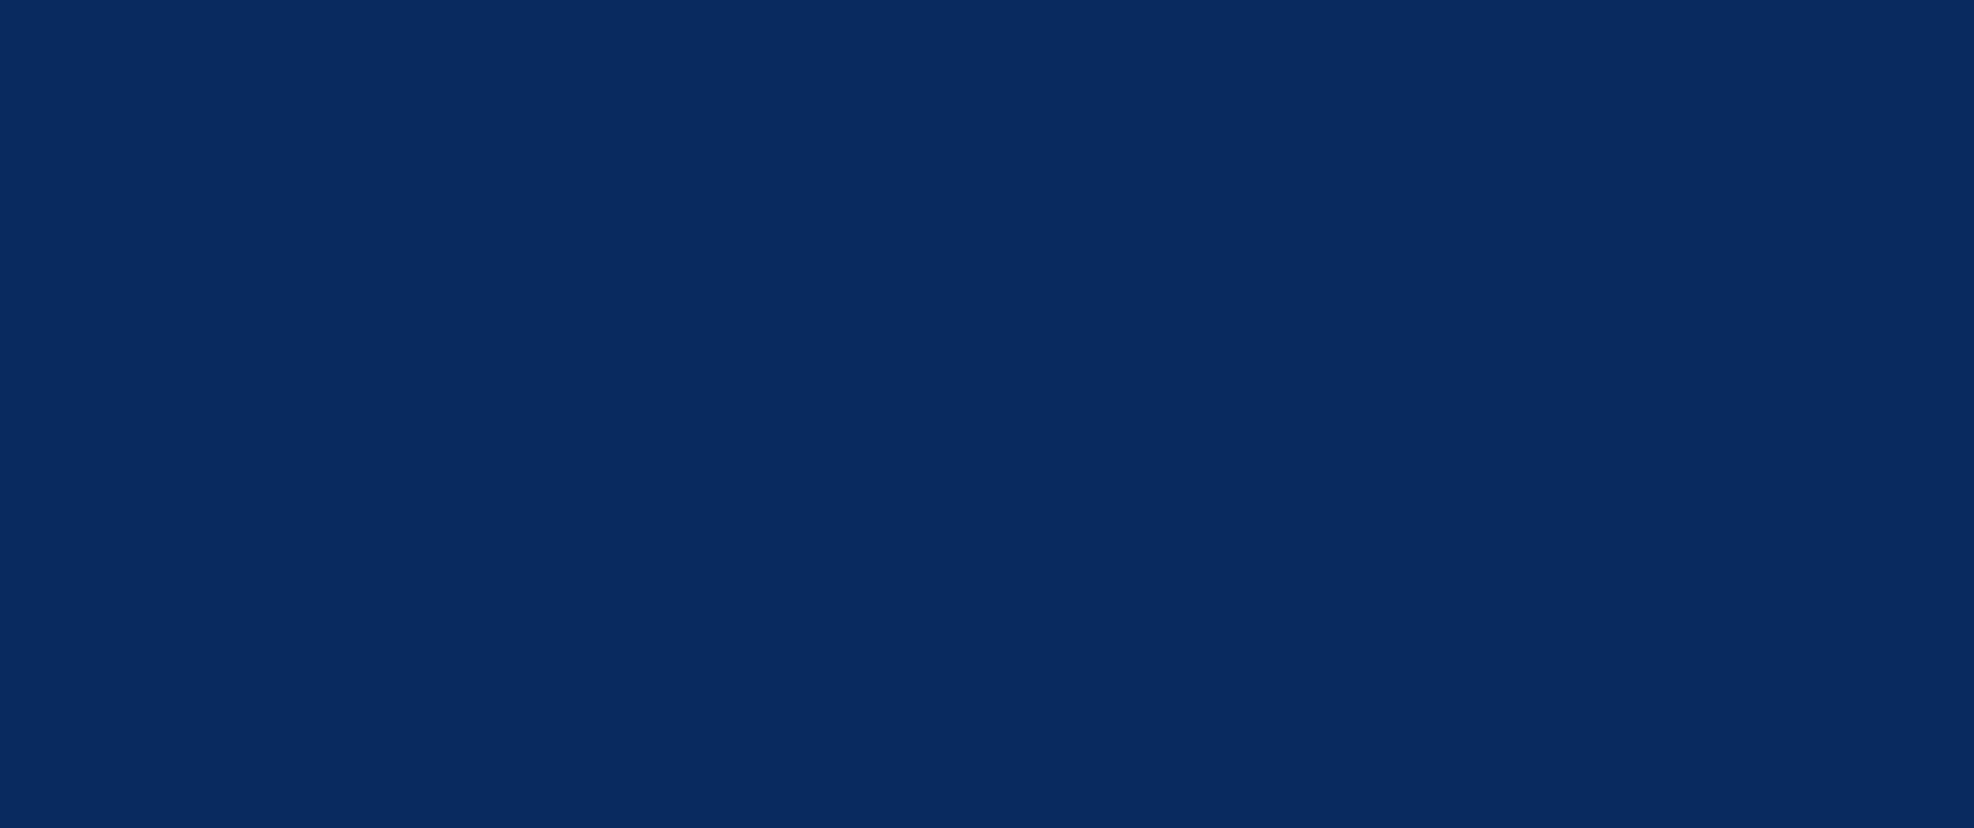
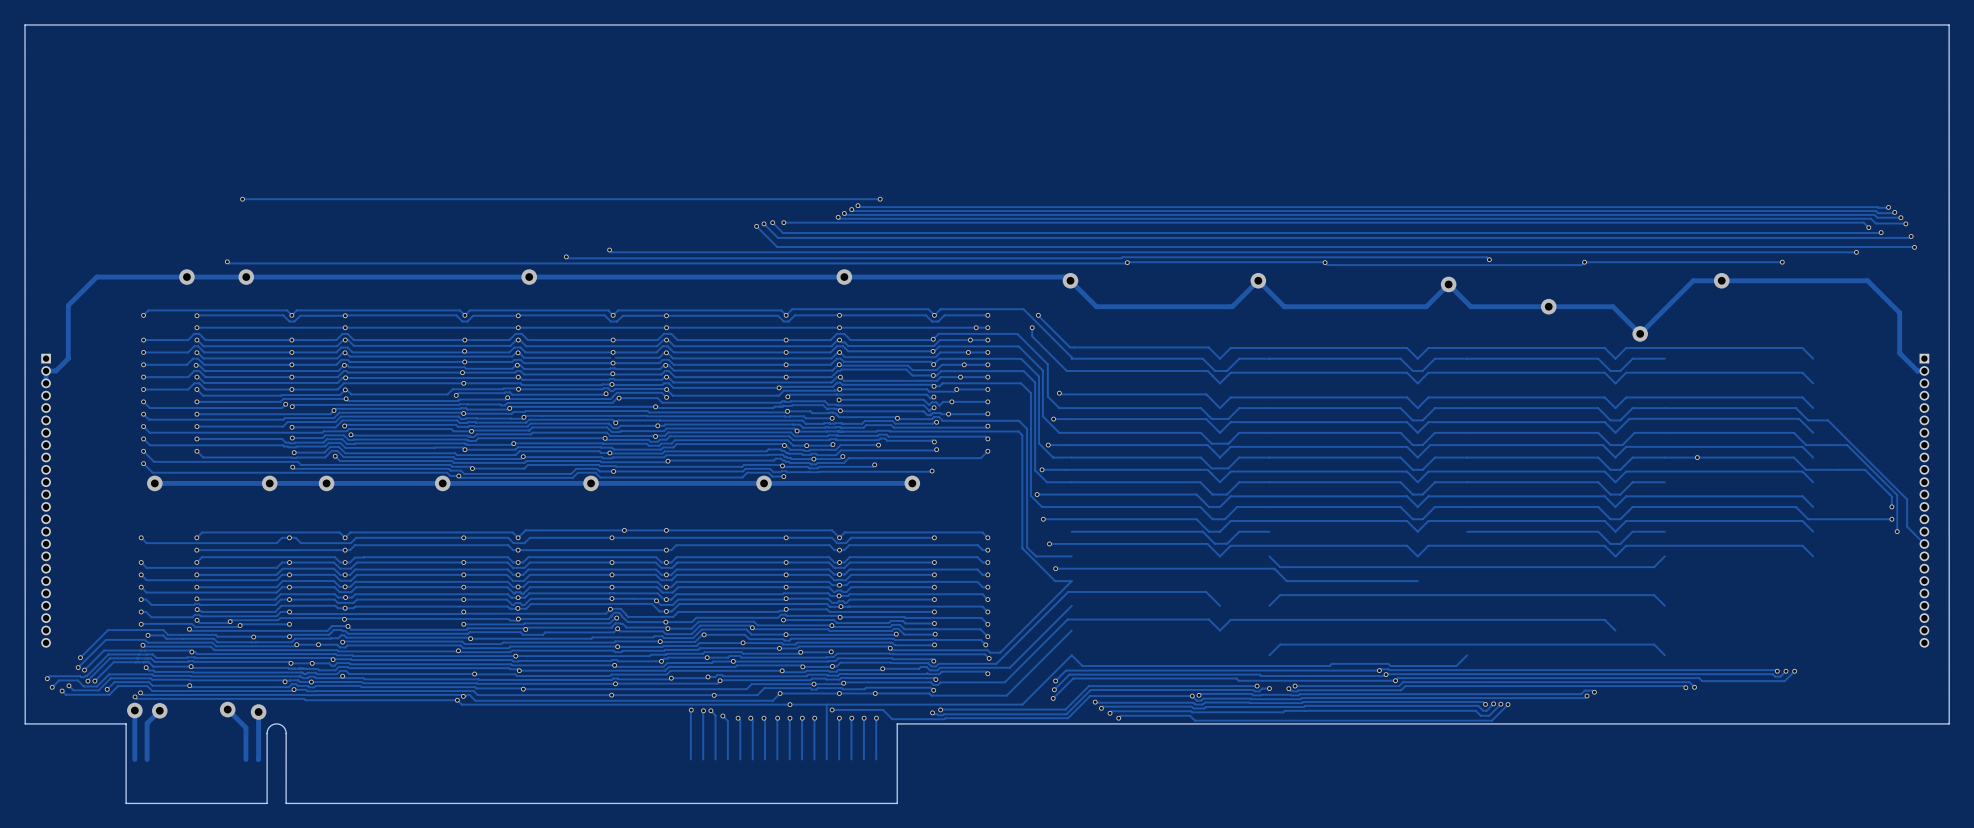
board edge: none -> (1949, 25) (1949, 723) (897, 723) (897, 803) (286, 803) (286, 732) (282, 726) (276, 723) (270, 726) (267, 732) (267, 803) (126, 803) (126, 723) (25, 723) (25, 25) (1949, 25)
via: none -> (242, 199)
track: none -> (880, 199) (242, 199)
via: none -> (880, 199)
track: none -> (857, 205) (1888, 207)
via: none -> (857, 205)
via: none -> (1888, 207)
track: none -> (851, 209) (1894, 212)
via: none -> (851, 209)
via: none -> (1894, 212)
track: none -> (844, 213) (1874, 214) (1877, 217) (1900, 217)
via: none -> (844, 213)
track: none -> (838, 217) (1871, 218) (1875, 223) (1905, 223)
via: none -> (838, 217)
via: none -> (1900, 217)
track: none -> (772, 222) (782, 232) (1881, 232)
via: none -> (772, 222)
track: none -> (783, 222) (1863, 222) (1868, 227)
via: none -> (783, 222)
track: none -> (764, 223) (778, 237) (1911, 236)
via: none -> (764, 223)
via: none -> (1905, 223)
track: none -> (756, 226) (777, 246) (1914, 247)
via: none -> (756, 226)
via: none -> (1868, 227)
via: none -> (1881, 232)
via: none -> (1911, 236)
via: none -> (1914, 247)
track: none -> (609, 250) (611, 252) (1856, 252)
via: none -> (609, 250)
via: none -> (1856, 252)
track: none -> (566, 256) (1486, 257) (1489, 259)
via: none -> (566, 256)
via: none -> (1489, 259)
track: none -> (227, 261) (228, 263) (1324, 262) (1327, 265) (1581, 265) (1584, 262) (1782, 262)
via: none -> (227, 261)
via: none -> (1127, 262)
via: none -> (1325, 262)
via: none -> (1584, 262)
via: none -> (1782, 262)
via: none -> (186, 277)
via: none -> (246, 277)
via: none -> (529, 277)
via: none -> (844, 277)
via: none -> (1070, 280)
via: none -> (1258, 280)
via: none -> (1721, 280)
via: none -> (1448, 284)
via: none -> (1548, 306)
via: none -> (143, 315)
via: none -> (196, 315)
track: none -> (291, 315) (287, 310) (148, 310) (143, 315)
via: none -> (291, 315)
via: none -> (345, 315)
track: none -> (464, 315) (460, 310) (296, 310) (291, 315)
via: none -> (464, 315)
via: none -> (518, 315)
track: none -> (613, 315) (608, 310) (469, 310) (464, 315)
via: none -> (613, 315)
via: none -> (666, 315)
track: none -> (786, 315) (781, 310) (618, 310) (613, 315)
via: none -> (786, 315)
via: none -> (839, 315)
track: none -> (934, 315) (928, 309) (792, 309) (786, 315)
track: none -> (934, 315) (940, 309) (1023, 309) (1071, 358) (1202, 358) (1215, 370) (1226, 370) (1239, 358) (1400, 358) (1412, 370) (1422, 370) (1434, 358) (1598, 358) (1610, 370) (1620, 370) (1632, 358) (1664, 358)
via: none -> (934, 315)
track: none -> (987, 315) (944, 315) (938, 321) (932, 321) (925, 315) (794, 315) (788, 321) (783, 321) (778, 315) (622, 315) (616, 321) (610, 321) (604, 315) (473, 315) (467, 321) (462, 321) (456, 315) (300, 315) (294, 321) (289, 321) (283, 315) (196, 315)
via: none -> (987, 315)
track: none -> (1038, 315) (1070, 347) (1208, 347) (1220, 358) (1230, 348) (1407, 348) (1417, 358) (1428, 348) (1604, 348) (1615, 358) (1626, 348) (1802, 348) (1813, 358)
via: none -> (1038, 315)
via: none -> (196, 327)
via: none -> (345, 327)
via: none -> (518, 327)
via: none -> (666, 327)
via: none -> (839, 327)
via: none -> (976, 327)
track: none -> (987, 327) (196, 327)
via: none -> (987, 327)
track: none -> (1032, 327) (1032, 336) (1066, 370) (1207, 370) (1212, 375)
via: none -> (1032, 327)
via: none -> (1640, 333)
via: none -> (933, 339)
track: none -> (143, 340) (188, 340) (194, 333) (199, 333) (205, 340) (336, 340) (342, 333) (347, 333) (353, 340) (509, 340) (515, 333) (521, 333) (528, 340) (657, 340) (663, 333) (671, 333) (677, 340) (830, 340) (836, 333) (844, 333) (850, 340) (932, 340) (938, 333) (1017, 333) (1047, 364) (1047, 396) (1059, 408) (1200, 408) (1211, 418) (1228, 418) (1239, 408) (1400, 408) (1412, 420) (1422, 420) (1434, 408) (1598, 408) (1610, 420) (1620, 420) (1632, 408) (1795, 408) (1808, 420) (1828, 420) (1907, 499) (1907, 526) (1924, 543)
via: none -> (143, 340)
via: none -> (196, 340)
via: none -> (291, 340)
via: none -> (345, 340)
via: none -> (464, 340)
via: none -> (518, 340)
via: none -> (613, 340)
via: none -> (666, 340)
via: none -> (786, 340)
via: none -> (839, 340)
via: none -> (970, 340)
track: none -> (987, 340) (940, 340) (934, 345) (848, 345) (837, 340) (831, 346) (674, 346) (668, 340) (663, 340) (657, 346) (526, 346) (519, 340) (516, 340) (510, 345) (353, 345) (348, 340) (343, 340) (337, 346) (203, 346) (196, 340)
via: none -> (987, 340)
via: none -> (464, 351)
track: none -> (848, 351) (843, 346) (836, 346) (830, 352) (673, 352) (667, 346) (662, 346) (656, 352) (613, 352)
track: none -> (848, 351) (934, 351) (939, 346) (1018, 346) (1042, 370) (1042, 416) (1059, 432) (1200, 432) (1211, 443) (1228, 443) (1239, 432) (1400, 432) (1412, 445) (1422, 445) (1434, 432) (1598, 432) (1610, 445) (1622, 445) (1634, 432) (1793, 432) (1806, 445) (1847, 445) (1897, 495) (1897, 531)
via: none -> (933, 351)
via: none -> (143, 352)
track: none -> (196, 352) (203, 358) (337, 358) (342, 352) (346, 352) (349, 356) (512, 356) (515, 352) (519, 352) (524, 357) (610, 357)
via: none -> (196, 352)
via: none -> (291, 352)
via: none -> (345, 352)
via: none -> (518, 352)
track: none -> (613, 352) (525, 352) (520, 347) (514, 347) (509, 352) (352, 352) (347, 347) (341, 347) (336, 352) (204, 352) (198, 346) (194, 346) (188, 352) (143, 352)
via: none -> (613, 352)
via: none -> (666, 352)
via: none -> (786, 352)
via: none -> (839, 352)
via: none -> (968, 352)
track: none -> (987, 352) (940, 352) (935, 357) (844, 357) (837, 352) (831, 358) (672, 358) (667, 352) (664, 352) (659, 357) (615, 357)
via: none -> (987, 352)
via: none -> (464, 361)
track: none -> (612, 363) (523, 363) (520, 359) (514, 359) (512, 361) (349, 361) (347, 359) (341, 359) (336, 364) (204, 364) (198, 358) (193, 358) (186, 364) (143, 364)
track: none -> (613, 363) (659, 363) (662, 359) (668, 359) (673, 364) (830, 364) (836, 358) (840, 358) (843, 361) (930, 361) (933, 364) (939, 358) (1021, 358) (1039, 376) (1039, 443) (1053, 457) (1200, 457) (1211, 468) (1228, 468) (1239, 457) (1400, 457) (1412, 469) (1422, 469) (1434, 457) (1598, 457) (1610, 469) (1620, 469) (1632, 457) (1793, 457) (1806, 469) (1865, 469) (1891, 496) (1891, 506)
via: none -> (613, 363)
via: none -> (143, 364)
via: none -> (291, 364)
via: none -> (786, 364)
via: none -> (839, 364)
via: none -> (933, 364)
via: none -> (964, 364)
track: none -> (987, 364) (941, 364) (936, 370) (912, 370) (908, 365) (838, 364) (832, 370) (674, 370) (668, 365) (664, 365) (660, 369) (524, 369) (520, 365) (515, 365) (512, 368) (349, 367) (344, 365) (338, 370) (204, 370) (199, 365) (196, 365)
via: none -> (987, 364)
via: none -> (196, 365)
via: none -> (344, 365)
via: none -> (517, 365)
via: none -> (665, 365)
track: none -> (1924, 370) (1917, 370) (1899, 353) (1899, 312) (1867, 280) (1693, 280) (1640, 333) (1613, 306) (1470, 306) (1448, 284) (1426, 306) (1284, 306) (1258, 280) (1232, 306) (1096, 306) (1066, 277) (96, 277) (68, 305) (68, 358) (55, 370) (46, 370) (46, 383)
via: none -> (462, 372)
via: none -> (612, 373)
via: none -> (933, 375)
track: none -> (1212, 376) (1220, 383) (1230, 372) (1407, 372) (1417, 383) (1428, 372) (1604, 372) (1615, 383) (1626, 372) (1802, 372) (1813, 383)
track: none -> (143, 377) (188, 377) (194, 370) (199, 370) (205, 377) (337, 377) (343, 370) (348, 372) (515, 372) (520, 370) (524, 374) (661, 374) (665, 370) (668, 370) (675, 377) (831, 377) (841, 369) (906, 369) (912, 375) (936, 375) (941, 371) (1023, 371) (1035, 382) (1035, 470) (1046, 482) (1200, 482) (1212, 494) (1226, 494) (1239, 482) (1400, 482) (1412, 494) (1422, 494) (1434, 482) (1598, 482)
via: none -> (143, 377)
via: none -> (196, 377)
via: none -> (291, 377)
via: none -> (345, 377)
via: none -> (518, 377)
via: none -> (666, 377)
via: none -> (786, 377)
via: none -> (840, 377)
via: none -> (960, 377)
track: none -> (987, 377) (940, 377) (937, 380) (844, 380) (840, 377) (836, 377) (831, 382) (673, 382) (668, 377) (661, 379) (522, 379) (519, 377) (342, 377) (337, 382) (204, 382) (196, 377)
via: none -> (987, 377)
via: none -> (463, 383)
via: none -> (611, 384)
via: none -> (934, 386)
via: none -> (779, 387)
track: none -> (143, 389) (188, 389) (194, 383) (199, 383) (205, 389) (337, 389) (343, 383) (520, 383) (522, 385) (662, 385) (668, 383) (673, 387) (832, 386) (837, 382) (842, 384) (932, 384) (934, 386) (939, 386) (942, 383) (1021, 383) (1030, 393) (1030, 495) (1042, 506) (1200, 506)
via: none -> (143, 389)
via: none -> (196, 389)
via: none -> (291, 389)
via: none -> (345, 389)
via: none -> (518, 389)
via: none -> (666, 389)
via: none -> (839, 389)
via: none -> (956, 389)
track: none -> (987, 389) (956, 389) (954, 391) (929, 391) (926, 389) (783, 390) (778, 395) (672, 395) (666, 388) (615, 388) (611, 391) (608, 388) (452, 389) (447, 394) (351, 394) (345, 389) (340, 395) (203, 395) (196, 389)
via: none -> (987, 389)
track: none -> (606, 393) (512, 394) (505, 392) (458, 393) (456, 395)
via: none -> (606, 393)
track: none -> (1059, 393) (1206, 394) (1220, 408) (1230, 397) (1407, 397) (1417, 408) (1428, 397) (1604, 397) (1615, 408) (1626, 397) (1802, 397) (1813, 408)
via: none -> (1059, 393)
track: none -> (836, 394) (841, 394)
track: none -> (836, 394) (789, 394) (787, 396)
track: none -> (841, 394) (926, 394) (930, 398) (933, 397)
via: none -> (456, 395)
via: none -> (787, 396)
via: none -> (507, 397)
track: none -> (666, 397) (662, 392) (616, 392) (610, 399) (507, 397) (505, 399) (457, 401) (348, 401) (346, 398)
via: none -> (666, 397)
via: none -> (933, 397)
track: none -> (346, 398) (283, 398) (280, 401) (196, 401)
via: none -> (346, 398)
via: none -> (619, 398)
track: none -> (839, 400) (923, 399) (929, 405) (931, 402) (936, 402) (939, 405)
via: none -> (839, 400)
track: none -> (143, 401) (149, 408) (281, 408) (285, 404)
via: none -> (143, 401)
via: none -> (196, 401)
via: none -> (951, 401)
track: none -> (987, 401) (943, 401) (939, 405)
via: none -> (987, 401)
track: none -> (509, 402) (612, 402) (617, 398) (657, 398) (662, 402) (824, 401) (828, 404) (836, 405) (923, 405) (929, 410) (934, 407)
track: none -> (509, 403) (505, 405) (294, 404) (292, 406)
via: none -> (285, 404)
via: none -> (292, 406)
via: none -> (655, 406)
via: none -> (934, 407)
via: none -> (509, 408)
via: none -> (334, 410)
via: none -> (840, 410)
via: none -> (787, 411)
via: none -> (463, 413)
track: none -> (987, 413) (932, 413) (927, 415) (923, 411) (841, 411) (834, 408) (827, 409) (823, 405) (792, 405) (773, 408) (511, 406) (508, 409) (335, 408) (330, 414) (196, 414)
via: none -> (987, 413)
track: none -> (143, 414) (149, 419) (283, 419) (333, 418) (339, 412) (511, 413) (525, 411) (810, 411) (812, 413) (832, 412) (839, 417) (931, 419) (938, 416) (942, 420) (1019, 420) (1027, 428) (1027, 547) (1036, 556) (1071, 556)
via: none -> (143, 414)
via: none -> (196, 414)
via: none -> (948, 414)
via: none -> (523, 417)
track: none -> (832, 418) (805, 418) (803, 416) (525, 415) (522, 418) (461, 419) (458, 416) (340, 416) (335, 421) (287, 421) (283, 426) (196, 426)
via: none -> (832, 418)
via: none -> (897, 418)
track: none -> (1053, 419) (1206, 419) (1220, 432) (1230, 422) (1407, 422) (1417, 432) (1428, 422) (1604, 422) (1615, 432) (1629, 418) (1799, 418) (1813, 432)
via: none -> (1053, 419)
track: none -> (525, 422) (529, 419) (612, 419) (615, 422) (618, 420) (802, 420) (805, 423) (842, 423)
track: none -> (525, 422) (342, 420) (335, 427) (292, 427)
via: none -> (615, 422)
track: none -> (936, 422) (895, 423) (892, 421) (864, 421) (862, 423) (842, 423)
via: none -> (936, 422)
track: none -> (793, 424) (665, 424) (620, 425) (617, 428) (613, 428) (608, 423) (530, 423) (527, 426) (344, 425)
track: none -> (793, 424) (799, 424) (803, 427) (840, 427)
via: none -> (344, 425)
via: none -> (657, 425)
track: none -> (143, 426) (149, 432) (322, 432) (346, 431) (349, 429) (529, 430)
via: none -> (143, 426)
via: none -> (196, 426)
track: none -> (987, 426) (893, 427) (891, 425) (866, 425) (863, 427) (840, 427)
via: none -> (987, 426)
via: none -> (292, 427)
track: none -> (529, 430) (532, 427) (607, 427) (611, 432) (664, 431) (666, 428) (794, 428) (797, 431) (839, 431)
via: none -> (797, 430)
via: none -> (471, 431)
track: none -> (839, 431) (1018, 431) (1022, 435) (1022, 548) (1055, 581) (1071, 581) (1000, 652) (990, 652) (987, 650) (892, 650) (888, 646) (699, 648) (698, 649) (621, 652) (511, 650) (510, 652) (459, 652) (214, 650) (210, 646) (142, 645)
track: none -> (350, 434) (474, 437) (476, 434) (606, 432) (610, 435) (655, 436) (664, 435) (668, 432) (790, 432) (794, 436) (837, 435)
via: none -> (350, 434)
track: none -> (837, 435) (985, 436) (987, 438)
via: none -> (655, 436)
track: none -> (143, 438) (149, 445) (282, 445) (296, 447) (325, 446) (328, 443) (340, 443) (345, 447) (462, 447) (464, 449) (515, 449) (517, 447) (660, 449) (663, 447) (673, 447) (676, 444) (782, 444) (790, 449) (808, 451) (835, 449) (840, 445) (878, 445)
via: none -> (143, 438)
track: none -> (196, 438) (282, 438) (290, 443) (323, 442) (326, 439) (342, 439) (347, 444) (602, 443) (646, 443) (648, 445) (671, 443) (675, 440) (787, 440) (793, 445) (832, 444)
via: none -> (196, 438)
track: none -> (292, 438) (322, 438) (325, 435) (343, 435) (348, 440) (475, 440) (478, 438) (605, 438) (606, 439) (648, 439) (650, 441) (657, 441) (659, 439) (666, 439) (669, 436) (789, 436) (793, 440) (835, 439)
via: none -> (292, 438)
via: none -> (605, 438)
via: none -> (987, 438)
track: none -> (835, 439) (875, 440) (884, 438) (887, 440) (934, 441)
via: none -> (934, 441)
via: none -> (513, 443)
via: none -> (832, 444)
via: none -> (784, 445)
via: none -> (806, 445)
via: none -> (878, 445)
track: none -> (1048, 445) (1207, 445) (1220, 457)
via: none -> (1048, 445)
via: none -> (464, 449)
track: none -> (936, 449) (840, 450) (836, 455) (788, 453) (780, 449) (768, 449) (766, 451) (664, 451) (662, 453) (519, 451) (515, 455) (457, 455) (455, 453) (345, 453) (339, 447) (330, 447) (324, 452) (294, 452)
via: none -> (936, 449)
track: none -> (143, 451) (154, 461) (298, 461) (301, 464) (450, 464) (452, 466) (470, 466) (472, 468) (524, 468) (528, 464) (616, 466) (781, 464) (783, 466) (817, 468) (872, 466) (874, 464)
via: none -> (143, 451)
track: none -> (196, 451) (203, 457) (325, 457) (331, 450) (337, 450) (343, 457) (453, 457) (455, 458) (782, 454) (791, 459) (840, 459) (842, 456)
via: none -> (196, 451)
track: none -> (987, 451) (980, 458) (848, 458) (843, 462) (790, 462)
via: none -> (987, 451)
via: none -> (294, 452)
via: none -> (609, 453)
track: none -> (335, 456) (340, 461) (452, 461) (453, 462) (524, 462) (526, 461) (666, 462) (668, 460) (773, 460) (781, 458) (790, 462)
via: none -> (335, 456)
via: none -> (523, 456)
via: none -> (842, 456)
via: none -> (1697, 457)
track: none -> (1813, 457) (1802, 446) (1626, 446) (1615, 457) (1603, 445) (1430, 445) (1417, 457) (1407, 446) (1230, 446) (1220, 457)
via: none -> (813, 459)
via: none -> (667, 461)
track: none -> (143, 463) (152, 472) (447, 472) (450, 476) (460, 477) (572, 477) (577, 472) (595, 472) (600, 477) (742, 477) (747, 472) (768, 472) (772, 476) (783, 476)
via: none -> (143, 463)
via: none -> (874, 464)
via: none -> (782, 465)
track: none -> (292, 467) (294, 468) (448, 468) (450, 470) (461, 470) (464, 473) (571, 473) (576, 468) (597, 468) (599, 471) (743, 471) (745, 468) (770, 468) (773, 472) (808, 472)
via: none -> (292, 467)
via: none -> (472, 468)
track: none -> (1042, 469) (1207, 469) (1220, 482) (1230, 471) (1407, 471) (1417, 482) (1428, 471) (1604, 471) (1615, 482) (1626, 471) (1802, 471) (1813, 482)
via: none -> (1042, 469)
via: none -> (613, 471)
track: none -> (932, 471) (808, 472)
via: none -> (932, 471)
via: none -> (458, 476)
via: none -> (783, 476)
track: none -> (1598, 482) (1610, 494) (1620, 494) (1632, 482) (1664, 482)
via: none -> (154, 483)
via: none -> (269, 483)
via: none -> (326, 483)
via: none -> (442, 483)
via: none -> (591, 483)
via: none -> (764, 483)
track: none -> (912, 483) (154, 483)
via: none -> (912, 483)
track: none -> (1037, 494) (1196, 494) (1209, 506) (1220, 506) (1230, 496) (1407, 496) (1417, 506) (1428, 496) (1604, 496) (1615, 506) (1626, 496) (1802, 496) (1813, 506)
via: none -> (1037, 494)
part: none -> (46, 500)
part: none -> (1924, 500)
track: none -> (1200, 506) (1212, 519) (1224, 519) (1237, 506) (1400, 506) (1412, 519) (1422, 519) (1434, 506) (1598, 506) (1610, 519) (1620, 519) (1632, 506) (1795, 506) (1808, 519) (1891, 519)
via: none -> (1891, 506)
track: none -> (1043, 519) (1196, 519) (1209, 531) (1220, 531) (1230, 521) (1407, 521) (1417, 531) (1428, 521) (1604, 521) (1615, 531) (1626, 521) (1802, 521) (1813, 531)
via: none -> (1043, 519)
via: none -> (1891, 519)
via: none -> (624, 530)
via: none -> (666, 530)
track: none -> (1269, 531) (1239, 531) (1227, 543) (1214, 543) (1202, 531) (1071, 531)
track: none -> (1664, 531) (1632, 531) (1620, 543) (1610, 543) (1598, 531) (1467, 531)
via: none -> (1897, 531)
via: none -> (141, 537)
via: none -> (196, 537)
via: none -> (289, 537)
via: none -> (345, 537)
via: none -> (463, 537)
via: none -> (518, 537)
via: none -> (612, 537)
via: none -> (786, 537)
track: none -> (839, 537) (844, 532) (982, 532) (987, 537)
track: none -> (839, 537) (832, 530) (525, 530) (518, 537) (512, 532) (350, 532) (345, 537) (339, 532) (202, 532) (196, 537)
via: none -> (839, 537)
track: none -> (934, 537) (851, 537) (845, 543) (837, 543) (831, 537) (529, 537) (524, 543) (513, 543) (508, 537) (356, 537) (350, 543) (301, 543) (295, 537) (282, 537) (276, 543) (146, 543) (141, 537)
via: none -> (934, 537)
via: none -> (987, 537)
track: none -> (1049, 543) (1207, 543) (1220, 556) (1230, 545) (1407, 545) (1417, 556) (1428, 545) (1604, 545) (1615, 556) (1626, 545) (1802, 545) (1813, 556)
via: none -> (1049, 543)
via: none -> (196, 550)
via: none -> (345, 550)
via: none -> (518, 550)
via: none -> (666, 550)
via: none -> (839, 550)
track: none -> (987, 550) (982, 550) (977, 545) (849, 545) (844, 550) (834, 550) (829, 545) (676, 545) (671, 550) (513, 550) (508, 545) (355, 545) (350, 550) (196, 550)
via: none -> (987, 550)
track: none -> (1664, 556) (1654, 567) (1280, 567) (1269, 556)
via: none -> (141, 562)
via: none -> (196, 562)
via: none -> (289, 562)
via: none -> (345, 562)
via: none -> (463, 562)
via: none -> (518, 562)
via: none -> (612, 562)
via: none -> (666, 562)
via: none -> (786, 562)
via: none -> (839, 562)
track: none -> (934, 562) (849, 562) (844, 567) (834, 567) (828, 562) (677, 562) (672, 567) (661, 567) (655, 562) (529, 562) (524, 567) (513, 567) (507, 562) (356, 562) (350, 568) (340, 568) (334, 562) (282, 562) (276, 567) (146, 567) (141, 562)
via: none -> (934, 562)
track: none -> (987, 562) (982, 562) (977, 557) (849, 557) (844, 562) (834, 562) (829, 557) (676, 557) (671, 562) (661, 562) (656, 557) (528, 557) (523, 562) (513, 562) (507, 557) (364, 557) (355, 557) (350, 562) (340, 562) (334, 557) (202, 557) (196, 562)
via: none -> (987, 562)
track: none -> (1055, 568) (1274, 568) (1286, 581) (1417, 581)
via: none -> (1055, 568)
via: none -> (141, 574)
via: none -> (196, 574)
via: none -> (289, 574)
via: none -> (345, 574)
via: none -> (463, 574)
via: none -> (518, 574)
via: none -> (612, 574)
via: none -> (666, 574)
via: none -> (786, 574)
via: none -> (839, 574)
track: none -> (934, 574) (851, 574) (845, 580) (834, 580) (828, 574) (676, 574) (671, 580) (661, 580) (655, 574) (529, 574) (523, 581) (513, 581) (507, 574) (356, 574) (351, 580) (340, 580) (334, 574) (282, 574) (276, 580) (146, 580) (141, 574)
via: none -> (934, 574)
track: none -> (987, 574) (982, 574) (977, 569) (849, 569) (844, 574) (834, 574) (829, 569) (676, 569) (671, 574) (661, 574) (656, 569) (528, 569) (523, 574) (513, 574) (507, 569) (355, 569) (350, 574) (340, 574) (334, 568) (282, 568) (276, 574) (196, 574)
via: none -> (987, 574)
via: none -> (839, 585)
via: none -> (345, 586)
via: none -> (518, 586)
via: none -> (141, 587)
via: none -> (196, 587)
via: none -> (289, 587)
via: none -> (463, 587)
via: none -> (612, 587)
via: none -> (666, 587)
via: none -> (786, 587)
track: none -> (934, 587) (851, 587) (846, 592) (836, 590) (835, 592) (828, 587) (678, 587) (672, 592) (662, 592) (657, 587) (529, 587) (523, 593) (515, 592) (514, 593) (507, 587) (356, 587) (351, 592) (339, 592) (334, 587) (282, 587) (276, 592) (146, 592) (141, 587)
via: none -> (934, 587)
track: none -> (987, 587) (982, 587) (977, 581) (849, 581) (846, 585) (832, 585) (829, 581) (676, 581) (671, 587) (662, 587) (657, 581) (528, 581) (523, 586) (512, 586) (507, 581) (355, 581) (350, 586) (339, 586) (334, 581) (282, 581) (276, 587) (196, 587)
via: none -> (987, 587)
via: none -> (839, 595)
via: none -> (345, 597)
track: none -> (512, 597) (507, 594) (355, 594) (352, 597) (338, 597) (334, 594) (280, 594) (275, 599) (196, 598)
track: none -> (515, 597) (512, 597)
track: none -> (516, 597) (524, 597) (529, 593) (657, 593) (663, 599) (671, 599) (676, 594) (828, 593) (832, 596) (849, 594) (982, 594) (987, 599)
via: none -> (518, 597)
via: none -> (196, 598)
via: none -> (611, 598)
via: none -> (786, 598)
via: none -> (141, 599)
via: none -> (289, 599)
via: none -> (463, 599)
via: none -> (666, 599)
track: none -> (934, 599) (849, 599) (846, 602) (843, 601) (832, 602) (828, 598) (678, 599) (672, 604) (660, 604) (654, 598) (530, 598) (524, 604) (520, 603) (512, 604) (507, 599) (356, 599) (353, 602) (337, 602) (334, 599) (280, 599) (275, 604) (151, 604) (146, 599) (141, 599)
via: none -> (934, 599)
via: none -> (987, 599)
via: none -> (656, 600)
track: none -> (1071, 605) (1009, 667) (940, 667) (937, 670) (929, 670) (926, 667) (920, 667) (919, 668) (805, 672) (670, 670) (666, 674) (517, 676) (515, 674) (349, 674) (346, 670) (340, 670) (337, 674) (155, 671) (146, 667)
track: none -> (1220, 605) (1206, 591) (1068, 591) (996, 663) (938, 663) (936, 666) (931, 666) (928, 663) (840, 662) (836, 666) (831, 666) (669, 666) (665, 670) (519, 670) (509, 668) (347, 666) (338, 666) (335, 670) (319, 670) (287, 667) (191, 666)
track: none -> (1664, 605) (1654, 595) (1280, 595) (1269, 605)
via: none -> (840, 606)
via: none -> (345, 608)
via: none -> (517, 608)
track: none -> (197, 609) (201, 611) (275, 611) (281, 605) (335, 605) (337, 608) (507, 606) (510, 608) (526, 608) (530, 604) (652, 603) (659, 611) (671, 611) (679, 604) (827, 604) (829, 606) (982, 606) (987, 611)
via: none -> (197, 609)
track: none -> (610, 609) (605, 613) (465, 613) (463, 611) (461, 614) (291, 614) (289, 611) (280, 611) (276, 616) (194, 614) (192, 617) (151, 617) (146, 611) (141, 611)
track: none -> (610, 609) (620, 608) (628, 616) (663, 616)
via: none -> (610, 609)
via: none -> (786, 609)
via: none -> (141, 611)
via: none -> (289, 611)
via: none -> (463, 611)
via: none -> (666, 611)
track: none -> (934, 611) (829, 611) (826, 609) (786, 609) (778, 611) (678, 611) (673, 616) (668, 616)
via: none -> (934, 611)
via: none -> (987, 611)
track: none -> (668, 616) (663, 616)
via: none -> (840, 617)
track: none -> (616, 618) (609, 623) (463, 624)
via: none -> (616, 618)
via: none -> (344, 619)
via: none -> (518, 619)
track: none -> (197, 620) (199, 623) (228, 623) (231, 620) (278, 620) (280, 618) (508, 618) (510, 620) (608, 619) (614, 612) (618, 612) (627, 622) (692, 622) (696, 617) (778, 617) (781, 614) (785, 614) (840, 617) (981, 617) (987, 624)
via: none -> (197, 620)
track: none -> (783, 620) (833, 620) (836, 623) (888, 623) (890, 621) (902, 621) (905, 623) (934, 623)
via: none -> (783, 620)
via: none -> (230, 621)
via: none -> (665, 622)
via: none -> (934, 623)
via: none -> (141, 624)
track: none -> (289, 624) (241, 624) (238, 626) (195, 626) (192, 623) (141, 624)
via: none -> (289, 624)
via: none -> (463, 624)
via: none -> (987, 624)
via: none -> (240, 625)
via: none -> (831, 625)
via: none -> (348, 626)
via: none -> (752, 627)
via: none -> (617, 628)
via: none -> (667, 628)
track: none -> (189, 629) (191, 630) (327, 630) (332, 626) (347, 626) (351, 629) (525, 629) (527, 627) (612, 627) (615, 623) (622, 623) (626, 627) (691, 628) (698, 621) (753, 621) (757, 625) (890, 626) (892, 624) (900, 624) (904, 629) (980, 629) (987, 636)
via: none -> (189, 629)
via: none -> (525, 629)
track: none -> (1071, 630) (1006, 695) (780, 693) (772, 700) (475, 700) (469, 694) (142, 694) (140, 692)
track: none -> (1615, 630) (1604, 619) (1230, 619) (1220, 630) (1208, 619) (1067, 619) (1004, 682) (940, 682) (938, 684) (933, 684) (931, 682) (751, 684) (746, 689) (523, 689) (360, 685) (309, 687) (296, 684) (291, 684) (288, 687) (191, 687) (152, 685) (149, 682) (114, 682) (107, 689)
via: none -> (704, 634)
via: none -> (786, 634)
track: none -> (896, 634) (751, 634) (746, 629) (701, 629) (693, 638) (654, 636) (591, 638) (470, 638) (346, 637) (341, 635) (338, 638) (295, 638) (291, 642) (256, 642)
via: none -> (896, 634)
track: none -> (935, 634) (904, 634) (898, 628) (891, 630) (829, 630) (828, 629) (753, 629) (750, 625) (700, 625) (691, 634) (665, 634) (663, 631) (620, 631) (617, 628) (613, 632) (545, 632) (542, 634) (523, 634) (520, 632) (348, 633) (341, 629) (333, 629) (329, 634) (253, 637) (168, 634) (163, 630) (108, 630) (80, 657)
via: none -> (935, 634)
track: none -> (148, 635) (163, 635) (166, 638) (214, 638) (217, 642) (251, 642)
via: none -> (148, 635)
via: none -> (289, 636)
via: none -> (987, 636)
via: none -> (253, 637)
via: none -> (470, 638)
via: none -> (660, 641)
track: none -> (255, 642) (251, 642)
track: none -> (342, 642) (462, 641) (464, 644) (501, 644) (695, 641) (702, 634) (745, 634) (749, 639) (784, 640) (791, 638) (980, 639) (985, 644)
via: none -> (342, 642)
via: none -> (743, 642)
via: none -> (296, 644)
via: none -> (318, 644)
track: none -> (934, 644) (894, 645) (891, 642) (797, 642) (795, 644) (699, 643) (696, 646) (662, 646) (463, 648) (460, 645) (347, 645) (340, 647) (337, 644) (216, 646) (212, 642) (147, 642) (144, 639) (105, 639) (78, 667)
via: none -> (934, 644)
via: none -> (985, 644)
via: none -> (142, 645)
via: none -> (617, 646)
via: none -> (779, 648)
via: none -> (890, 648)
track: none -> (140, 650) (104, 650) (84, 670)
track: none -> (145, 650) (190, 650) (197, 654) (335, 654) (353, 656) (649, 656) (666, 653) (703, 653) (704, 652) (799, 653) (831, 651)
track: none -> (145, 650) (140, 650)
via: none -> (458, 650)
via: none -> (831, 651)
via: none -> (191, 652)
via: none -> (800, 652)
track: none -> (139, 654) (108, 654) (84, 677) (49, 676) (47, 678)
track: none -> (146, 654) (152, 654) (156, 657) (331, 657) (351, 660) (513, 661) (661, 661) (668, 657) (728, 657) (729, 656) (826, 657) (833, 657) (837, 653) (985, 654) (989, 658)
track: none -> (146, 654) (139, 654)
track: none -> (1467, 655) (1456, 665) (1390, 665) (1388, 663) (1331, 663) (1329, 665) (1082, 665) (1071, 655) (1022, 704) (461, 704) (457, 700) (137, 698) (135, 696)
track: none -> (1664, 655) (1654, 644) (1280, 644) (1269, 655)
via: none -> (515, 656)
via: none -> (80, 657)
via: none -> (707, 657)
track: none -> (148, 658) (154, 661) (289, 661) (329, 663) (331, 665) (337, 663) (349, 663) (616, 666) (663, 666) (667, 663) (713, 661) (828, 661) (835, 661) (838, 658) (931, 659) (933, 661)
track: none -> (148, 658) (110, 658) (87, 681)
via: none -> (989, 658)
via: none -> (333, 659)
via: none -> (661, 661)
via: none -> (733, 661)
via: none -> (933, 661)
via: none -> (290, 663)
via: none -> (312, 663)
via: none -> (614, 665)
track: none -> (191, 666) (153, 666) (148, 662) (113, 662) (94, 681)
via: none -> (191, 666)
via: none -> (802, 666)
via: none -> (832, 666)
via: none -> (78, 667)
via: none -> (146, 667)
via: none -> (882, 668)
via: none -> (84, 670)
via: none -> (519, 670)
via: none -> (782, 670)
via: none -> (1379, 670)
track: none -> (1777, 671) (1388, 669) (1065, 670) (1055, 680)
via: none -> (1777, 671)
track: none -> (1786, 671) (1780, 676) (1775, 676) (1772, 674) (1386, 674) (1384, 676) (1069, 674) (1054, 689)
via: none -> (1786, 671)
track: none -> (1794, 671) (1784, 681) (1702, 681) (1699, 678) (1398, 678) (1395, 680) (1073, 678) (1053, 698)
via: none -> (1794, 671)
track: none -> (987, 673) (985, 671) (941, 671) (939, 674) (839, 673) (838, 675) (808, 674) (806, 676) (717, 675) (706, 678) (611, 679) (364, 679) (344, 678) (342, 676) (340, 678) (302, 678) (301, 676) (109, 674) (97, 686) (83, 686) (77, 680) (59, 680) (52, 687)
via: none -> (987, 673)
via: none -> (474, 674)
via: none -> (1386, 674)
via: none -> (342, 676)
via: none -> (708, 676)
via: none -> (47, 678)
via: none -> (671, 678)
track: none -> (926, 678) (841, 677) (839, 679) (812, 678) (810, 680) (721, 680) (717, 683) (615, 683) (363, 683) (300, 682) (297, 680) (285, 681) (110, 678) (98, 690) (73, 690) (68, 685)
track: none -> (926, 678) (935, 679)
via: none -> (935, 679)
via: none -> (720, 680)
via: none -> (1055, 680)
via: none -> (1395, 680)
via: none -> (87, 681)
via: none -> (94, 681)
via: none -> (285, 681)
via: none -> (311, 682)
via: none -> (615, 683)
via: none -> (843, 683)
via: none -> (814, 684)
via: none -> (68, 685)
via: none -> (189, 685)
track: none -> (1257, 686) (1089, 686) (1065, 709) (940, 709)
via: none -> (1257, 686)
track: none -> (1295, 686) (1399, 686) (1403, 682) (1689, 682) (1694, 687)
via: none -> (1295, 686)
via: none -> (52, 687)
track: none -> (1685, 687) (1684, 686) (1405, 686) (1401, 690) (1297, 691) (1288, 688)
via: none -> (1685, 687)
via: none -> (1694, 687)
track: none -> (932, 688) (764, 688) (757, 695) (477, 695) (473, 691) (307, 691) (294, 689) (152, 691) (147, 686) (118, 686) (109, 694) (65, 694) (62, 691)
track: none -> (1269, 688) (1262, 688) (1259, 691) (1090, 689) (1066, 714) (938, 715) (932, 712)
via: none -> (1269, 688)
via: none -> (1288, 688)
via: none -> (107, 689)
via: none -> (294, 689)
via: none -> (523, 689)
via: none -> (1054, 689)
via: none -> (933, 690)
via: none -> (62, 691)
via: none -> (140, 692)
track: none -> (1594, 692) (1584, 690) (1581, 694) (1199, 695)
via: none -> (1594, 692)
via: none -> (780, 693)
via: none -> (839, 693)
via: none -> (875, 693)
via: none -> (611, 695)
via: none -> (714, 695)
via: none -> (1199, 695)
track: none -> (1587, 695) (1584, 698) (1203, 698) (1201, 700) (1196, 700) (1192, 696) (1090, 696) (1068, 718) (892, 719) (883, 709) (832, 709)
via: none -> (1587, 695)
via: none -> (135, 696)
via: none -> (463, 696)
via: none -> (1192, 696)
via: none -> (1053, 698)
via: none -> (457, 700)
track: none -> (1095, 702) (1193, 702) (1202, 704) (1204, 702) (1483, 701) (1485, 704)
via: none -> (1095, 702)
track: none -> (1493, 703) (1486, 710) (1483, 710) (1478, 705) (1304, 705) (1204, 708) (1193, 708) (1191, 706) (1103, 706) (1101, 708)
via: none -> (1493, 703)
via: none -> (789, 704)
track: none -> (827, 704) (826, 759)
via: none -> (1485, 704)
track: none -> (1500, 704) (1489, 715) (1480, 715) (1475, 710) (1112, 711) (1110, 713)
via: none -> (1500, 704)
track: none -> (1507, 704) (1491, 720) (1194, 720) (1189, 715) (1121, 715) (1118, 718)
via: none -> (1507, 704)
via: none -> (1101, 708)
track: none -> (227, 709) (245, 727) (245, 759)
via: none -> (227, 709)
via: none -> (832, 709)
via: none -> (940, 709)
track: none -> (134, 710) (134, 759)
via: none -> (134, 710)
track: none -> (159, 710) (147, 723) (147, 759)
via: none -> (159, 710)
track: none -> (691, 710) (690, 759)
via: none -> (691, 710)
track: none -> (703, 710) (703, 759)
via: none -> (703, 710)
track: none -> (710, 710) (715, 715) (715, 759)
via: none -> (710, 710)
track: none -> (258, 712) (258, 759)
via: none -> (258, 712)
via: none -> (932, 712)
via: none -> (1110, 713)
track: none -> (722, 716) (727, 721) (727, 759)
via: none -> (722, 716)
track: none -> (738, 718) (740, 720) (740, 759)
via: none -> (738, 718)
track: none -> (750, 718) (752, 720) (752, 759)
via: none -> (750, 718)
track: none -> (763, 718) (764, 759)
via: none -> (763, 718)
track: none -> (777, 718) (777, 759)
via: none -> (777, 718)
track: none -> (789, 718) (789, 759)
via: none -> (789, 718)
track: none -> (802, 718) (802, 759)
via: none -> (802, 718)
track: none -> (814, 718) (814, 759)
via: none -> (814, 718)
track: none -> (839, 718) (839, 759)
via: none -> (839, 718)
track: none -> (851, 718) (851, 759)
via: none -> (851, 718)
track: none -> (864, 718) (863, 759)
via: none -> (864, 718)
track: none -> (876, 718) (876, 759)
via: none -> (876, 718)
via: none -> (1118, 718)

